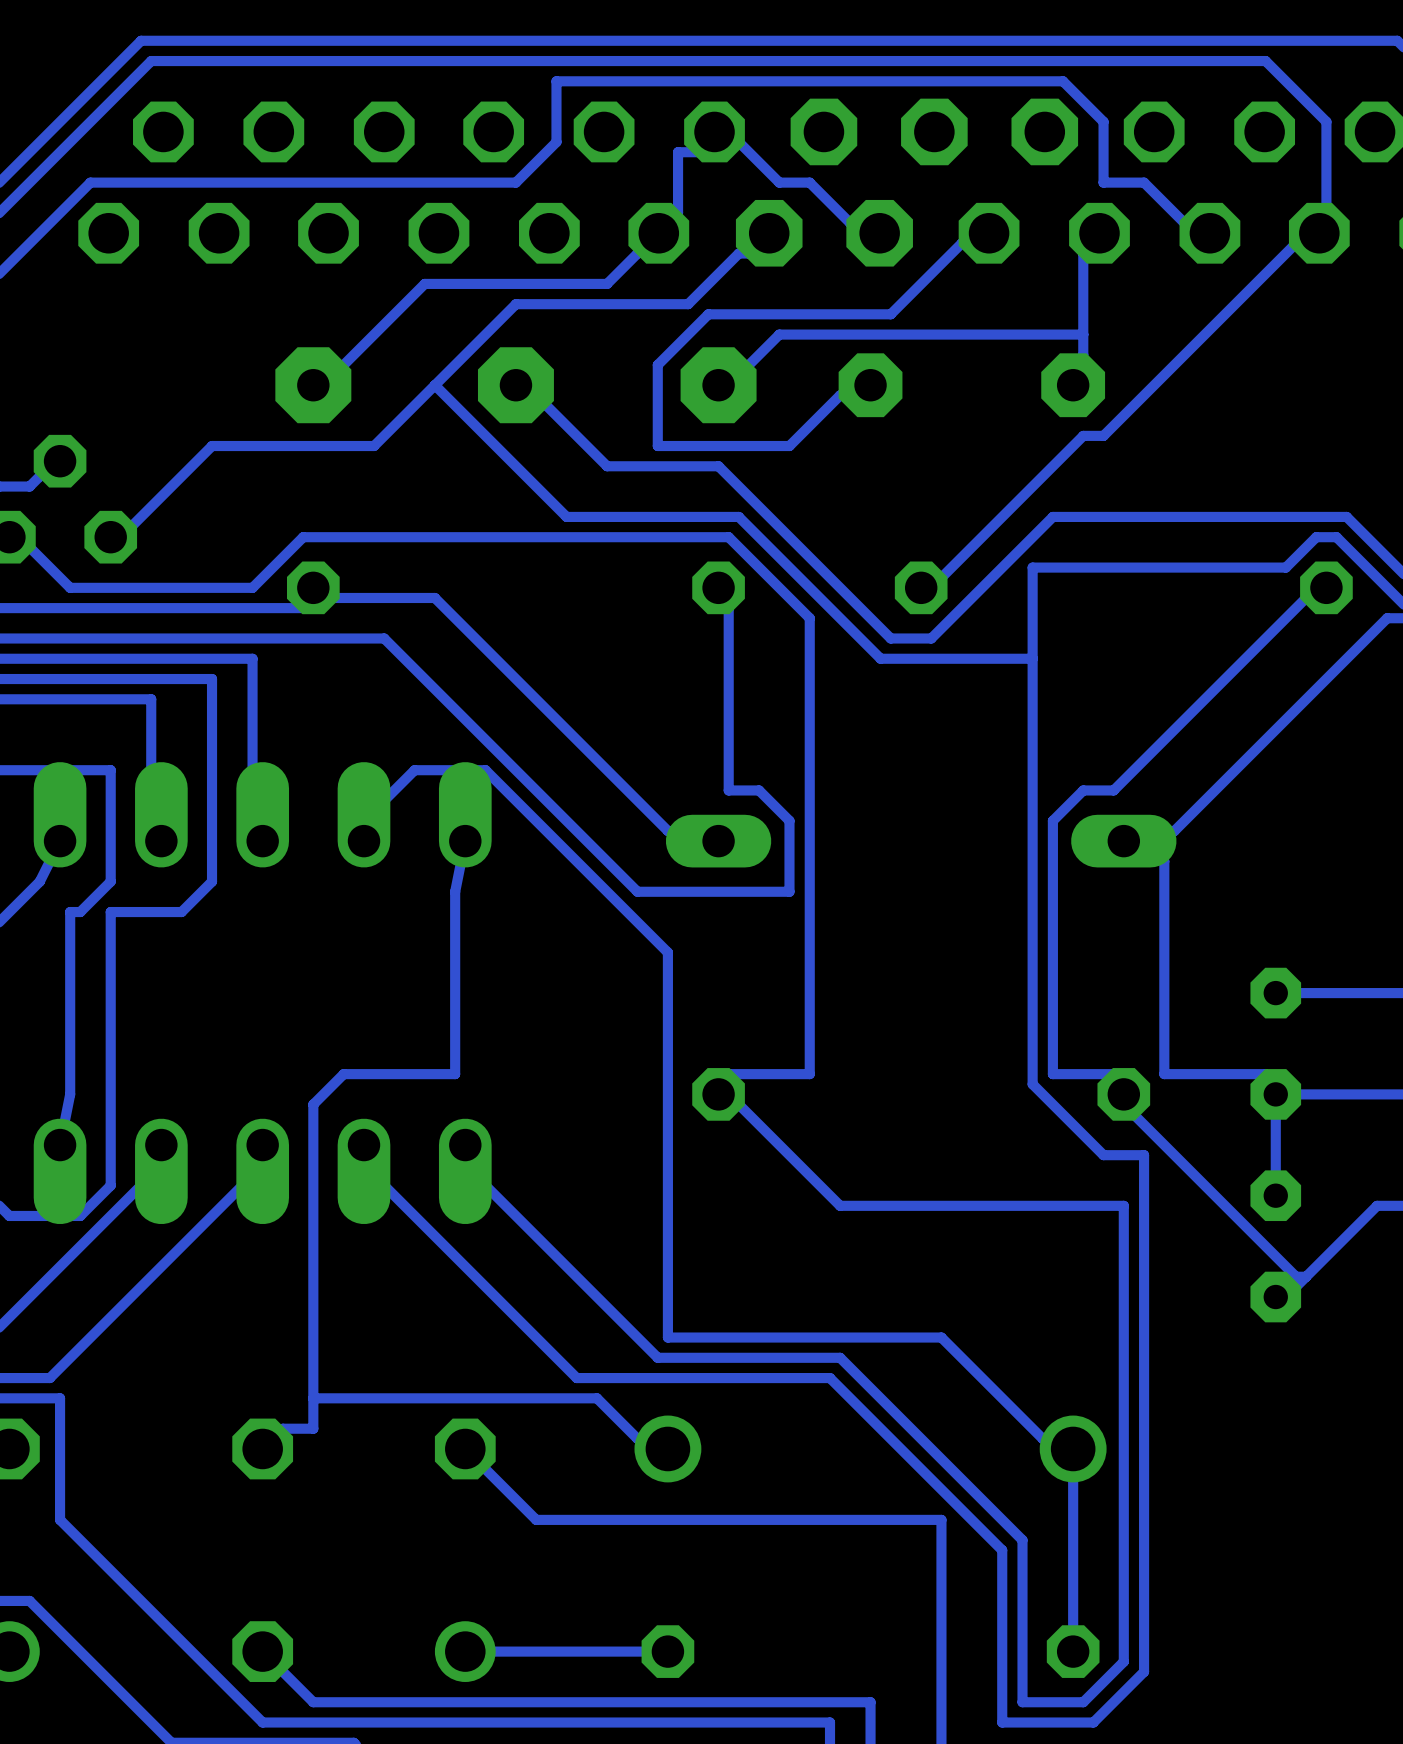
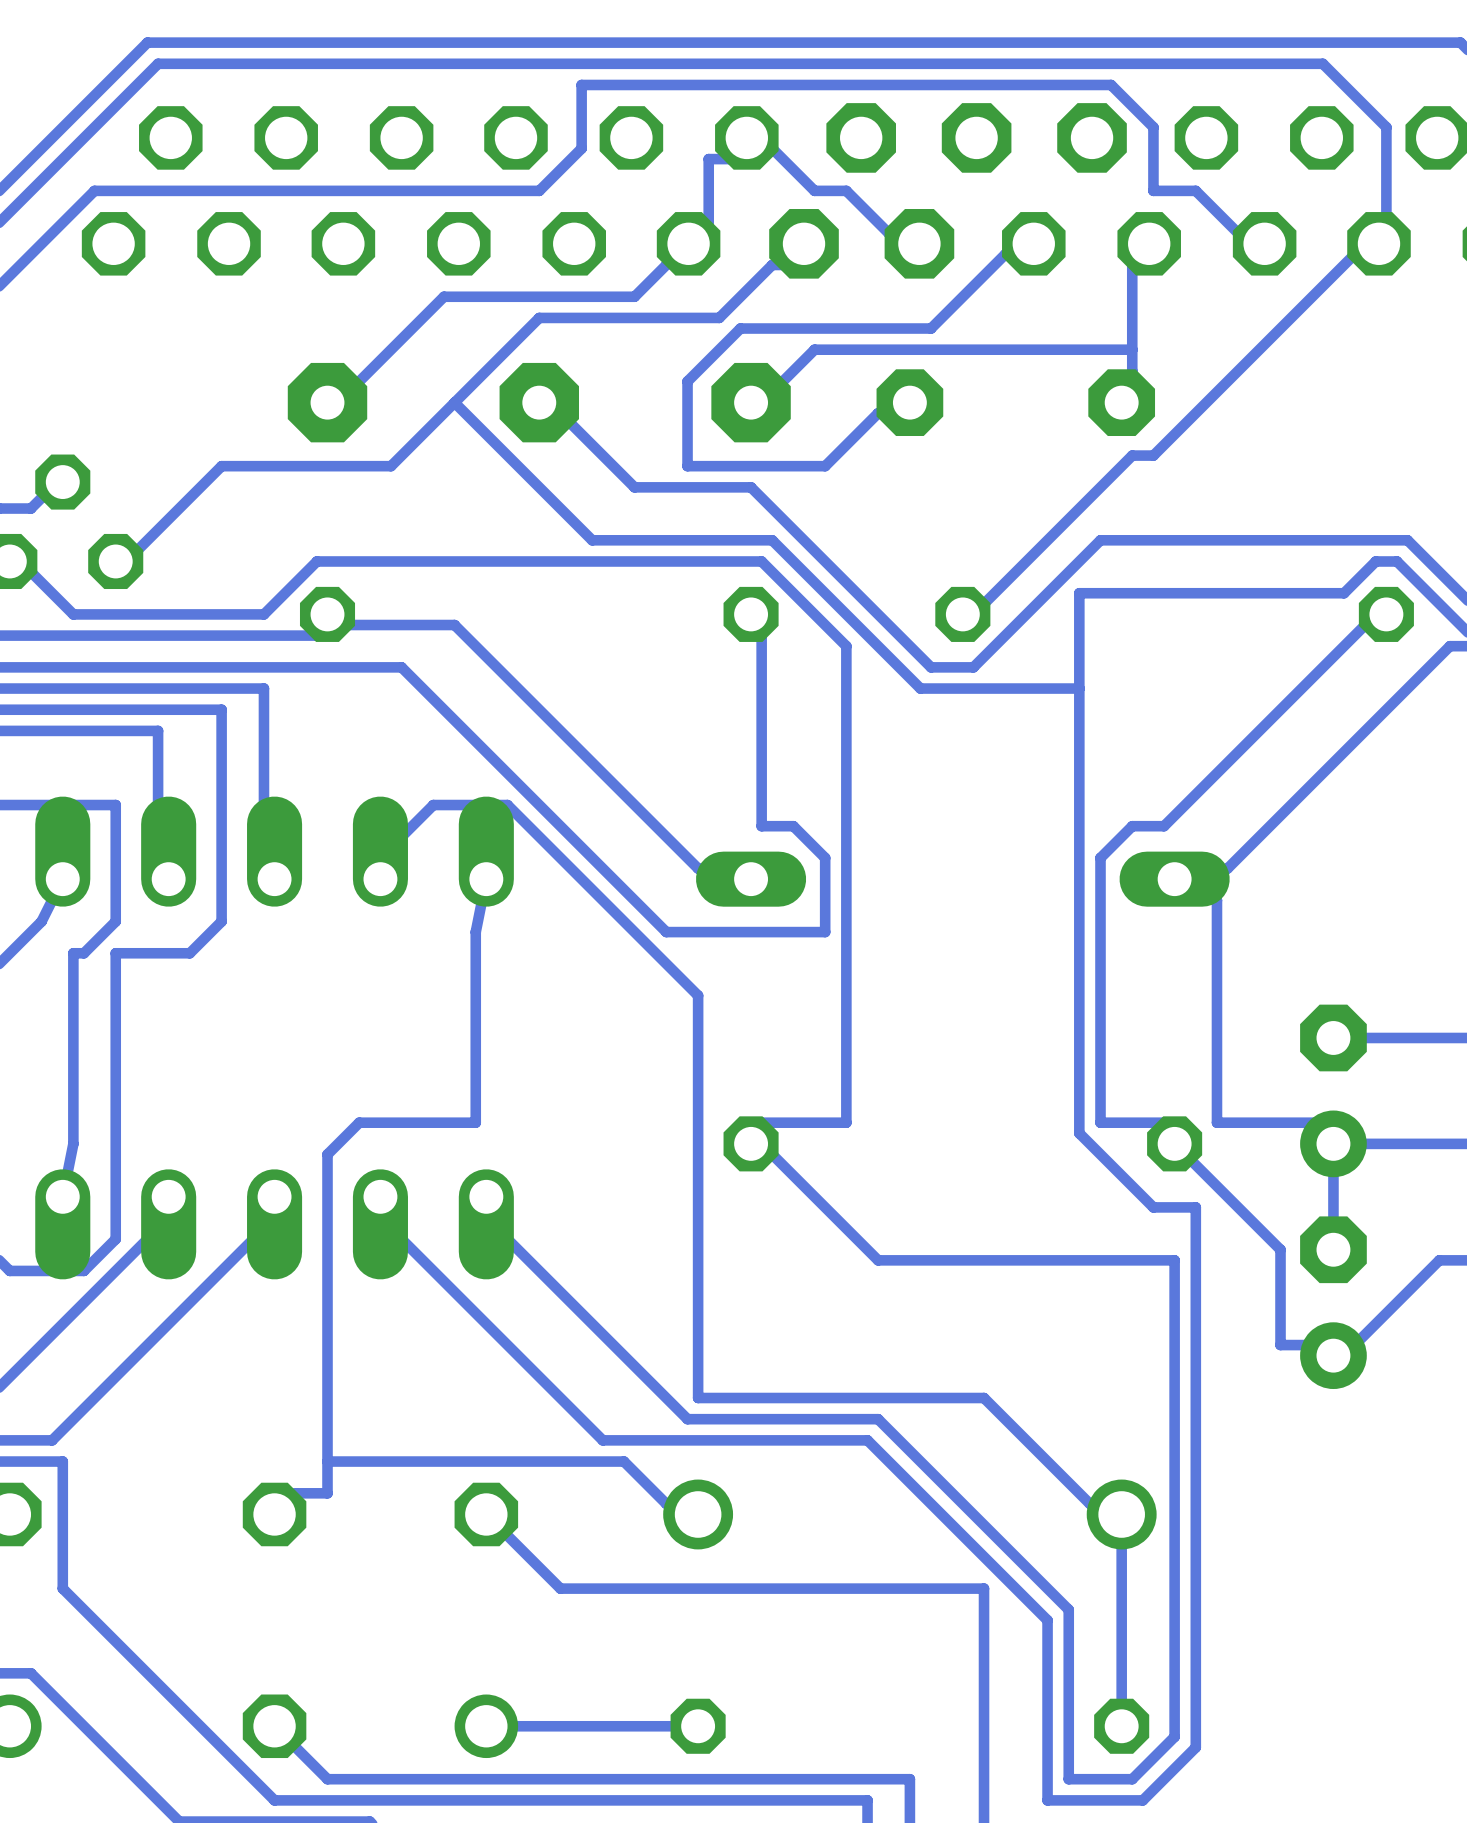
part footprint: [1250, 967, 1302, 1120] -> [1300, 1004, 1367, 1178]
bottom track: (1123, 1094) (1133, 1114) (1296, 1276) (1306, 1276) -> (1174, 1143) (1280, 1249) (1280, 1345) (1344, 1345) (1333, 1355)
part footprint: [1250, 1170, 1302, 1323] -> [1300, 1216, 1367, 1390]

